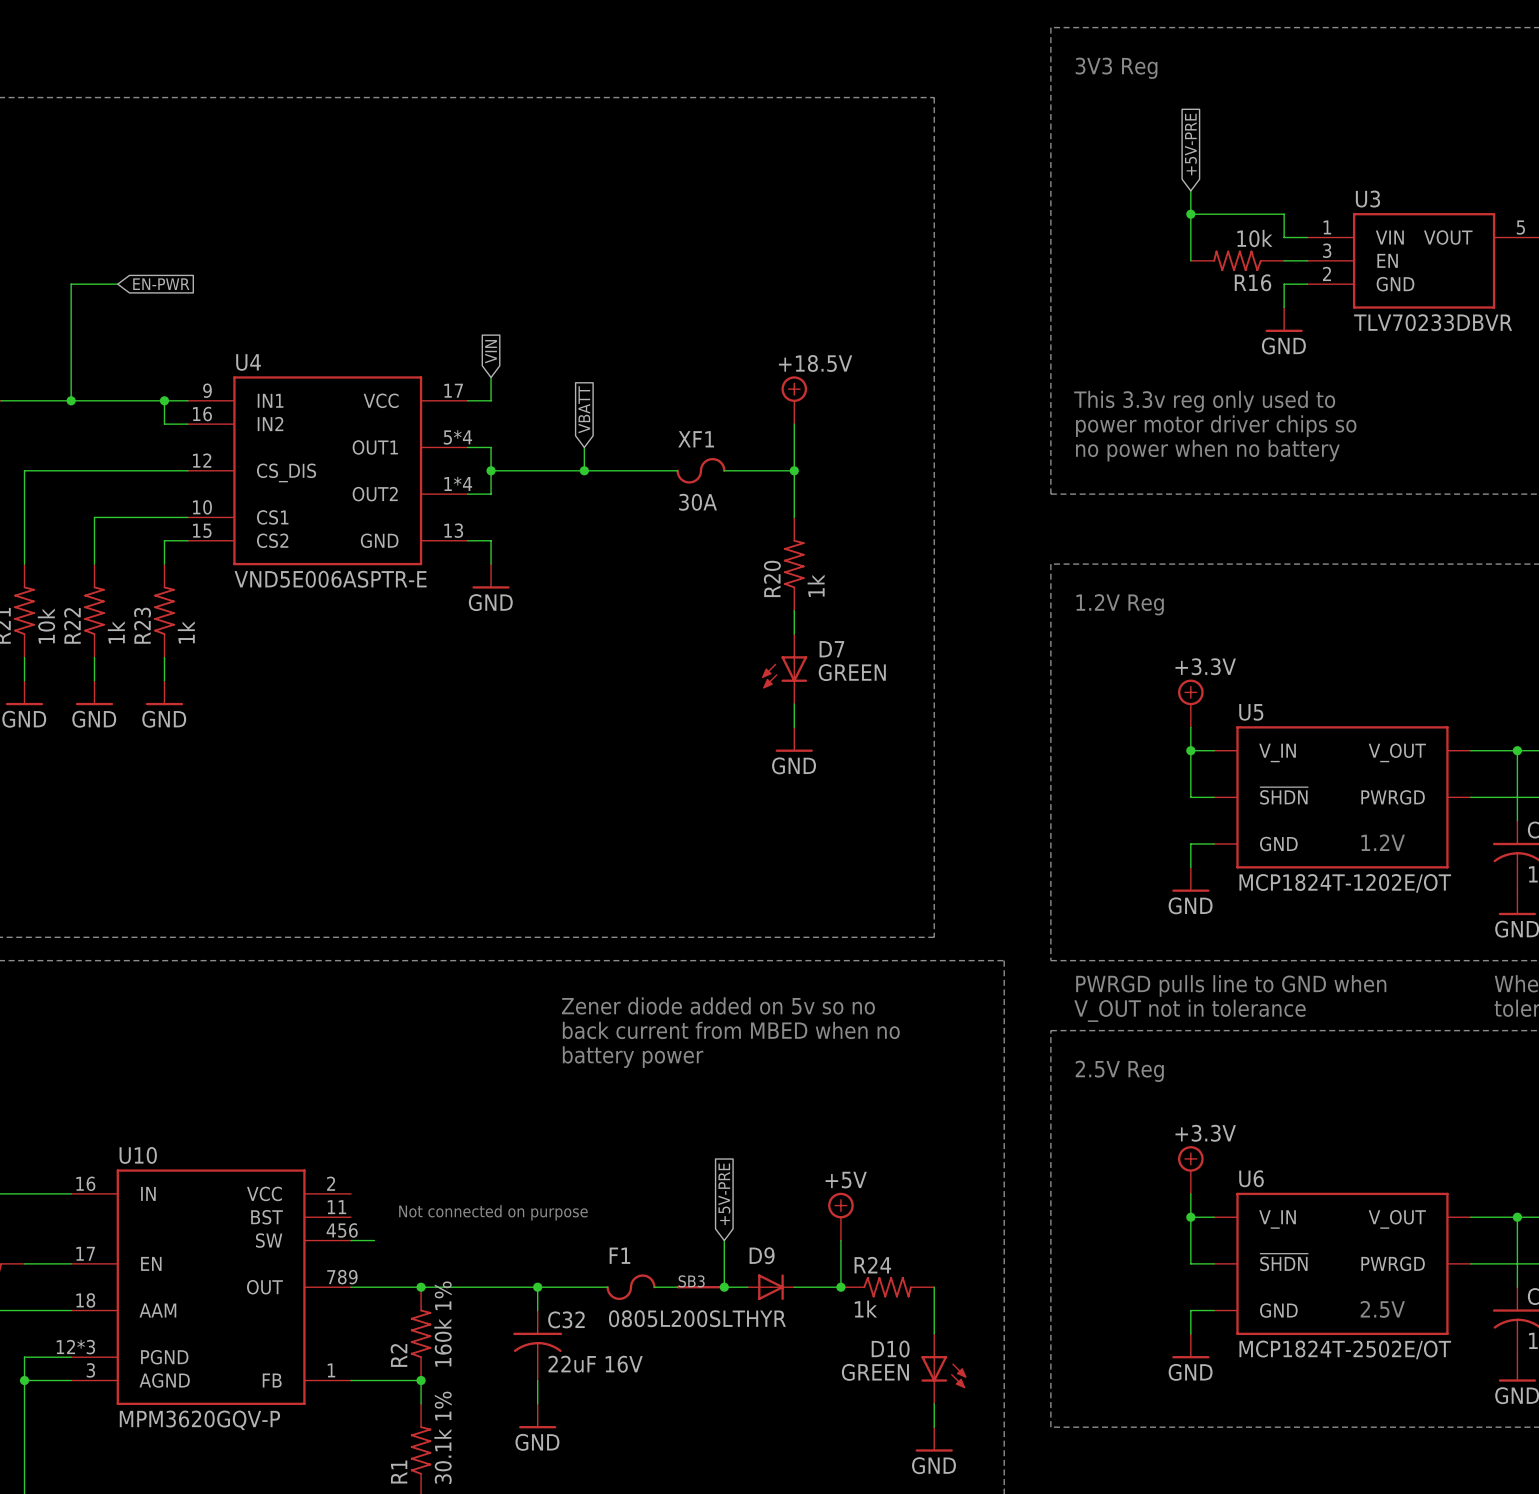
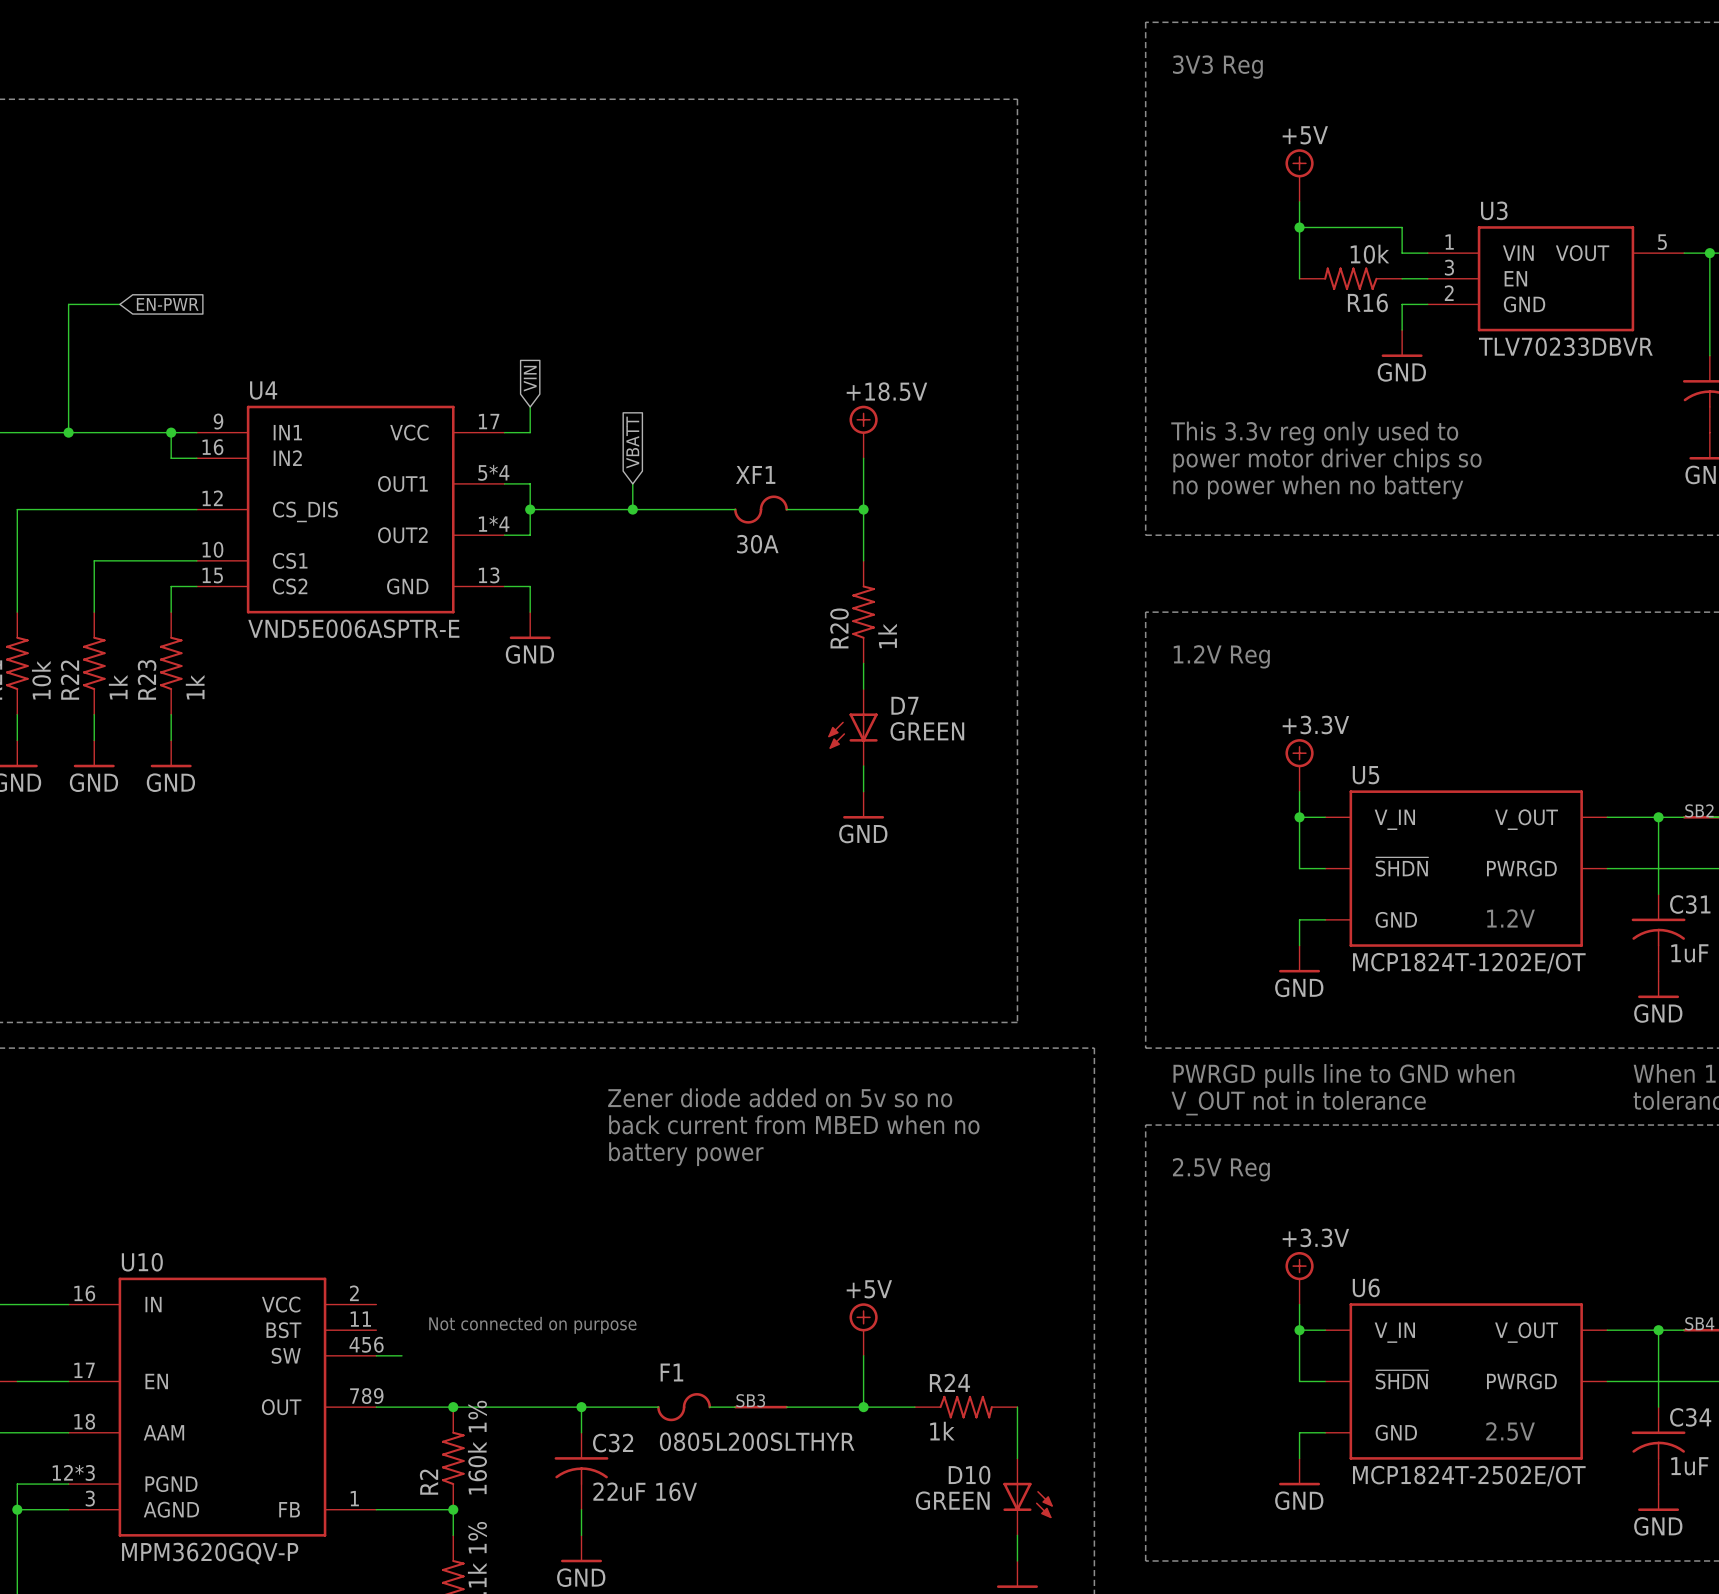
global label: +5V-PRE (1190, 144) -> none
power symbol: none -> +5V (1299, 175)
global label: +5V-PRE (724, 1194) -> none
power symbol position: +5V (840, 1216) -> +5V (863, 1329)
wire: (724, 1240) (724, 1287) -> none
wire: none -> (863, 1355) (863, 1407) (812, 1407)
wire: (840, 1240) (840, 1287) -> none
junction: (724, 1287) -> none
D9: (770, 1287) -> none
junction: none -> (863, 1407)
junction: (840, 1287) -> none

